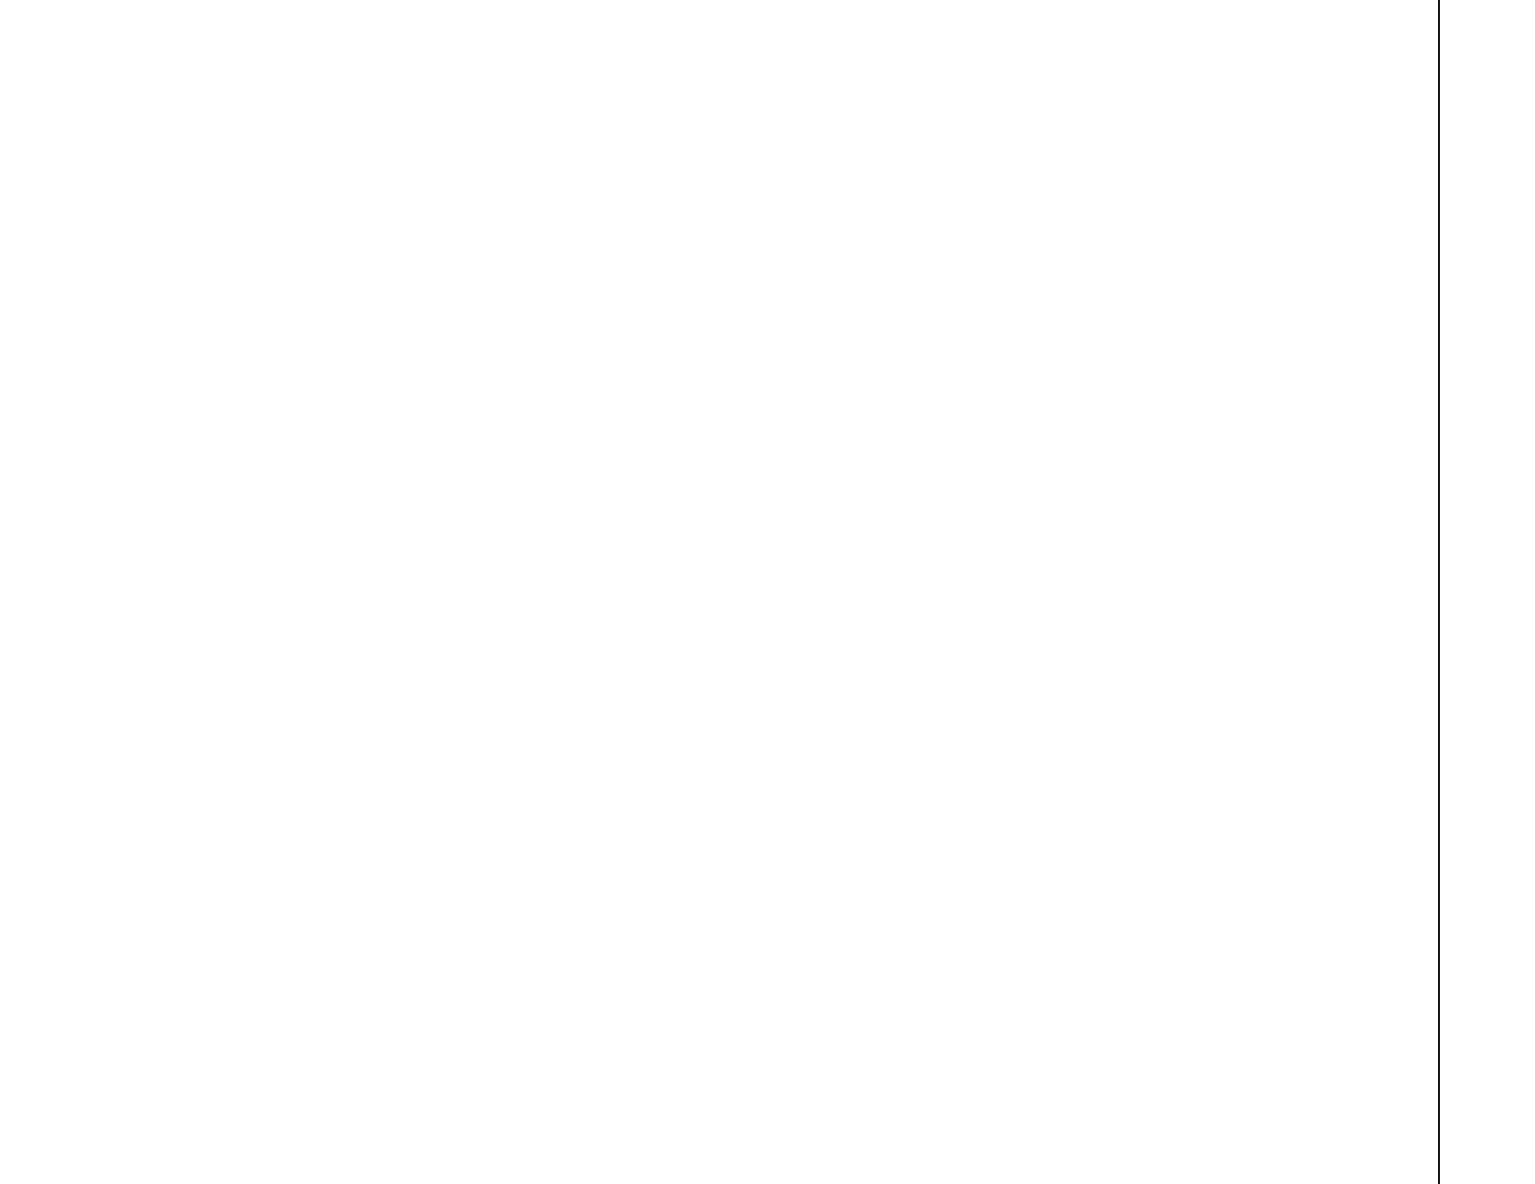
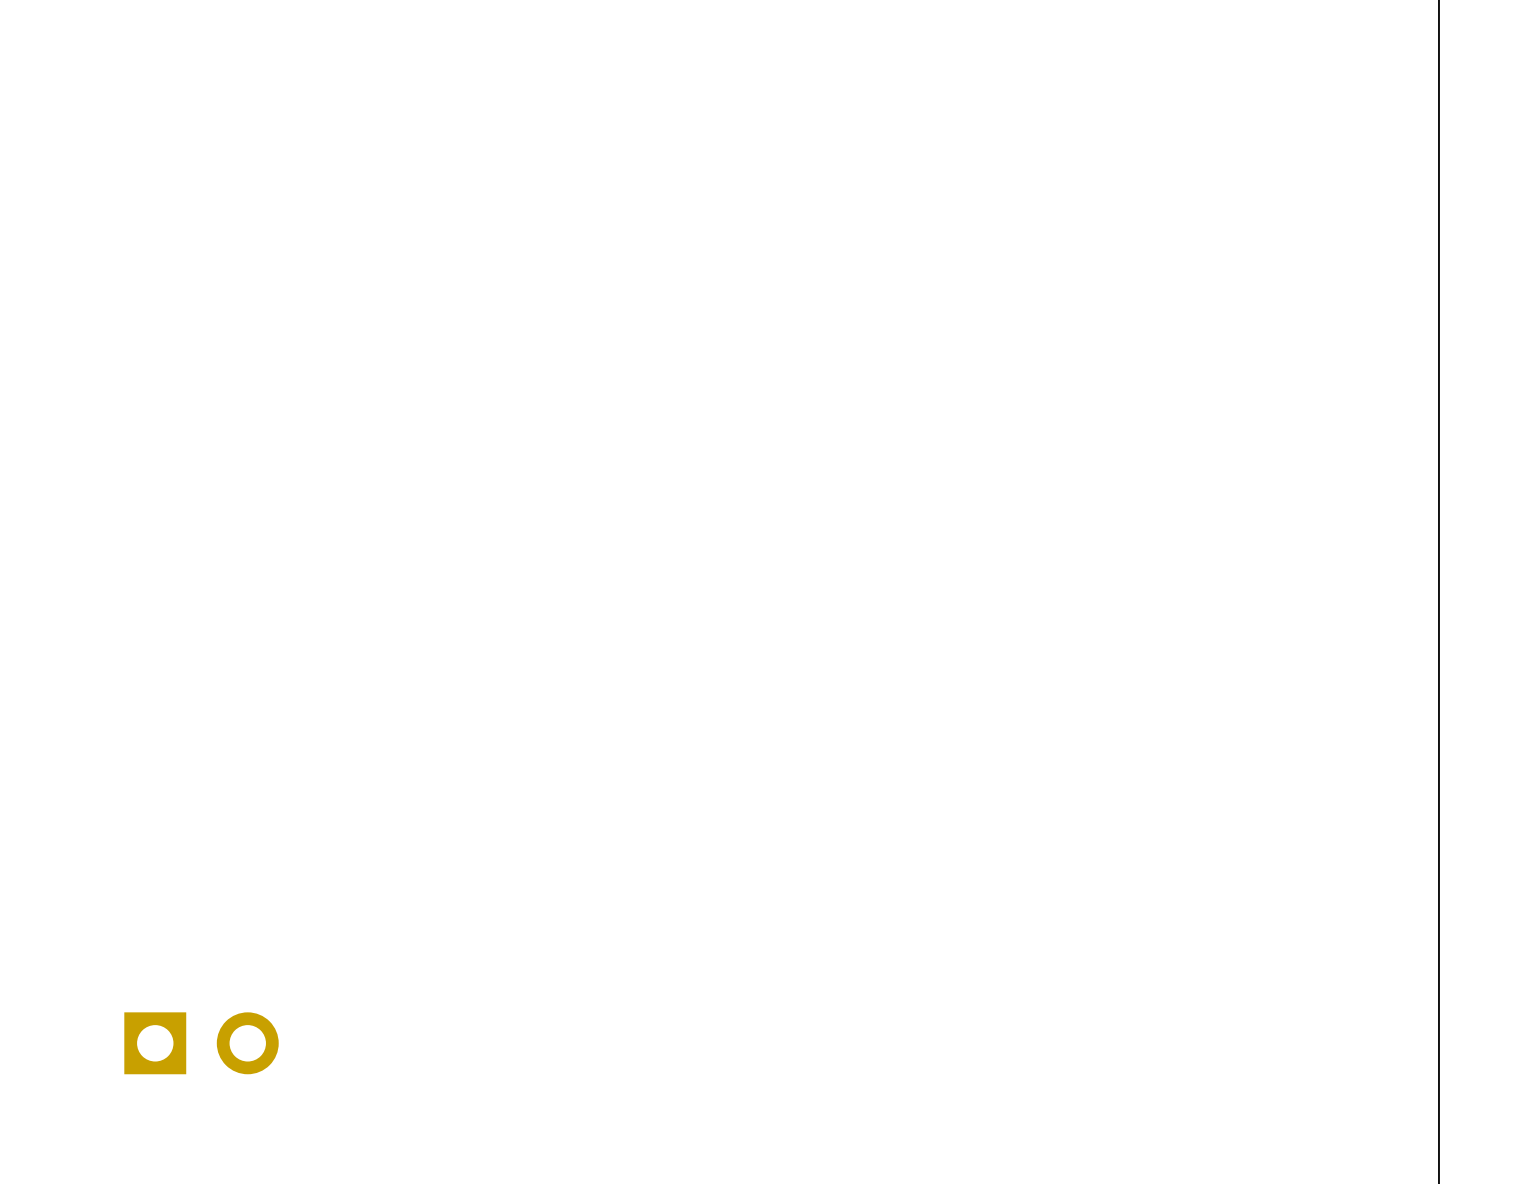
part: none -> (201, 1043)

